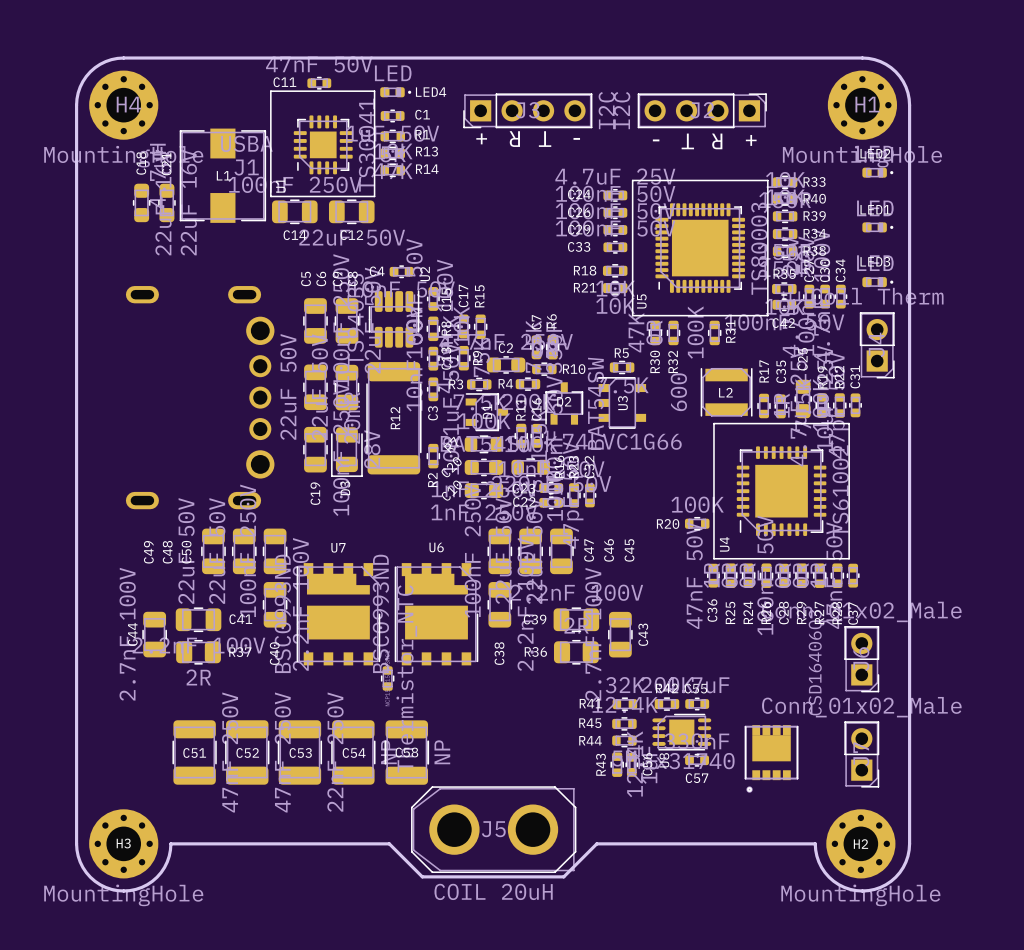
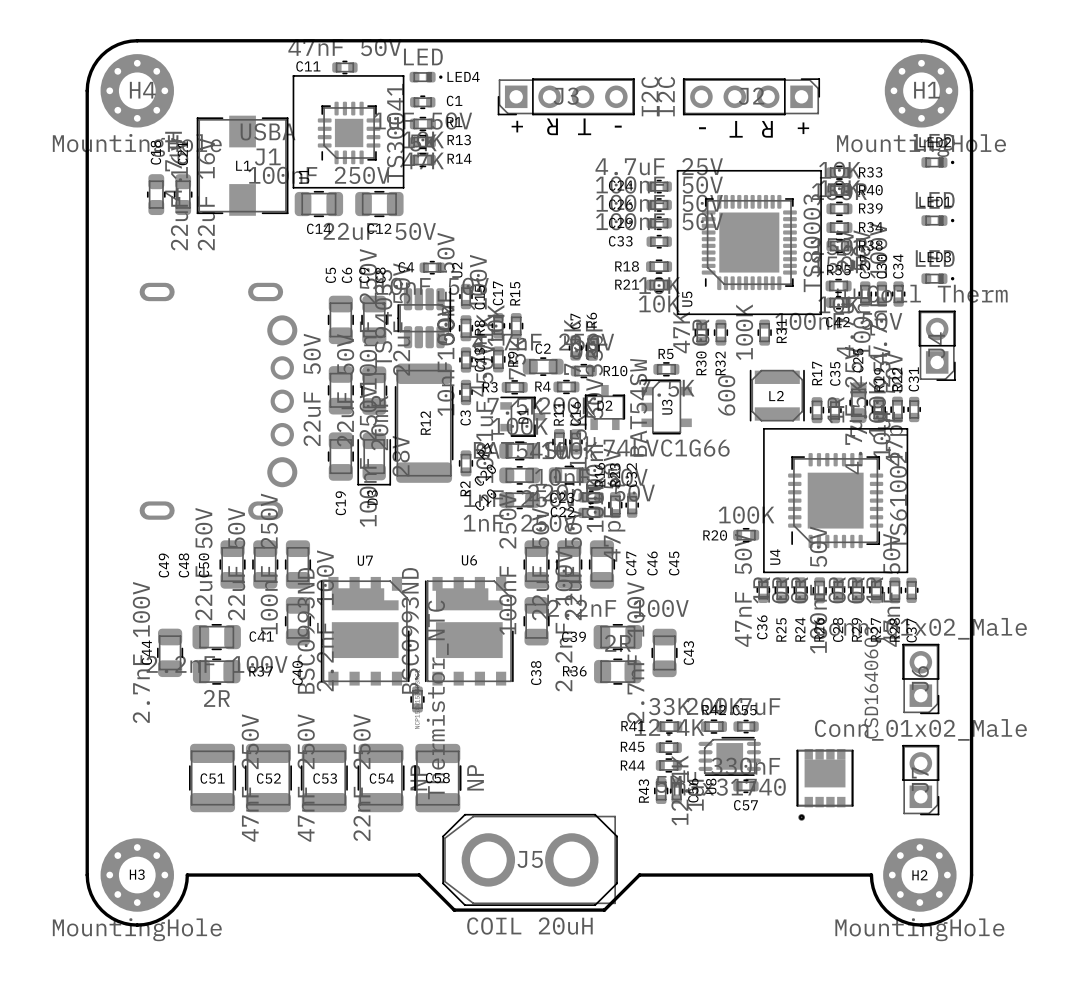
R41 value: 32K (625, 685) -> 33K (669, 706)

